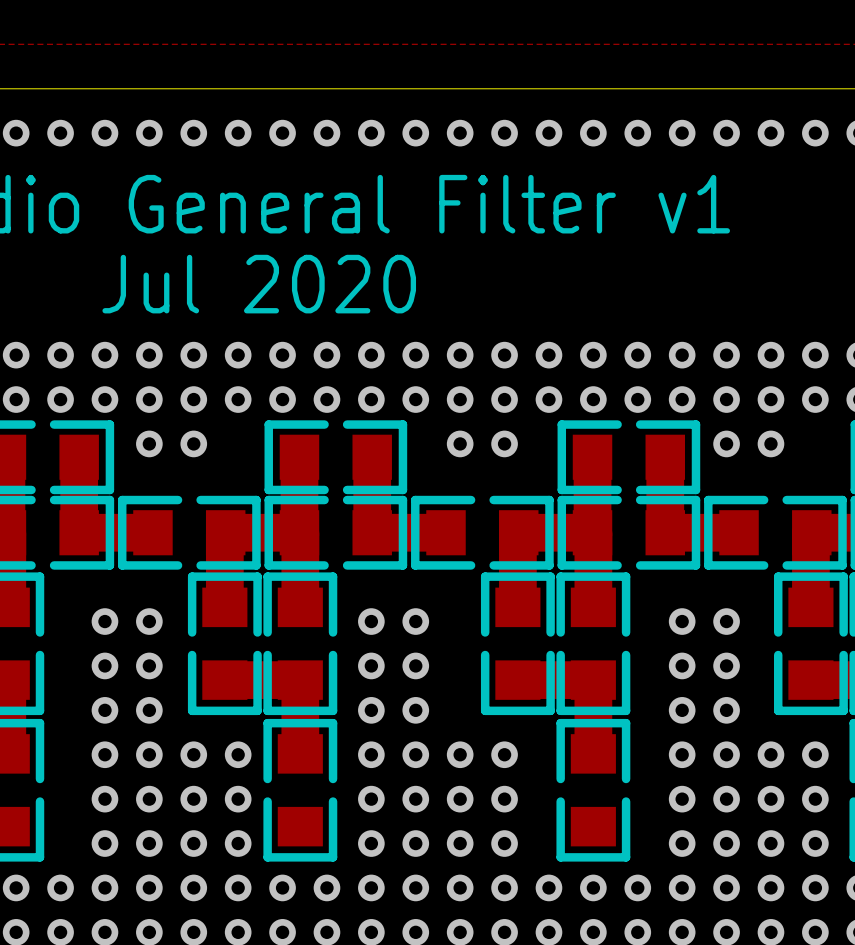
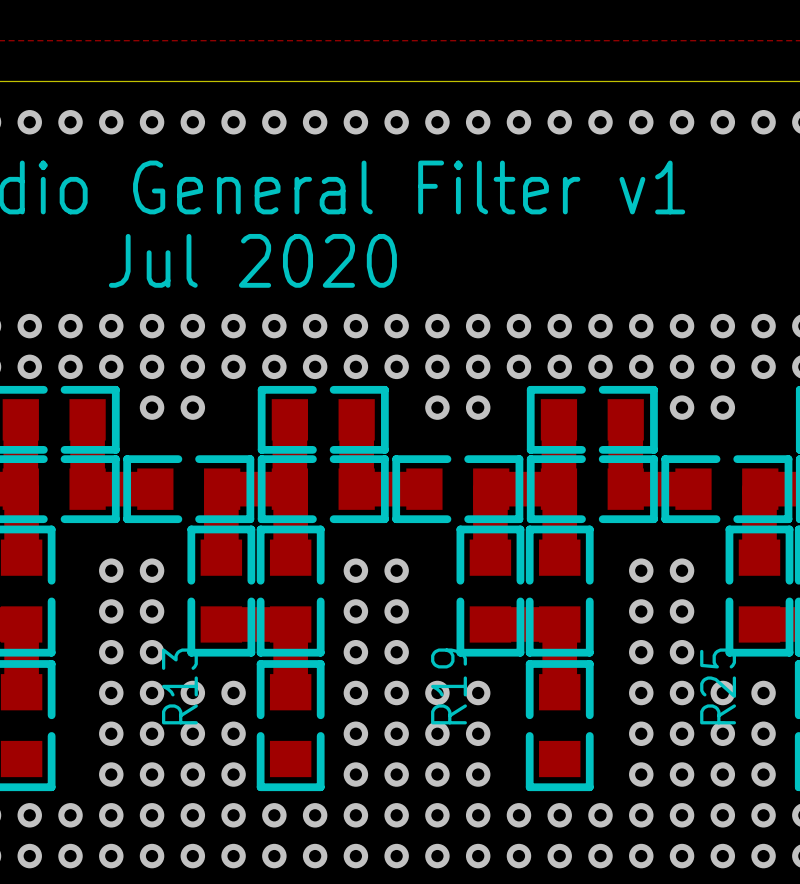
R13 name: none -> R13 (179, 686)
R19 name: none -> R19 (449, 686)
R25 name: none -> R25 (718, 686)

